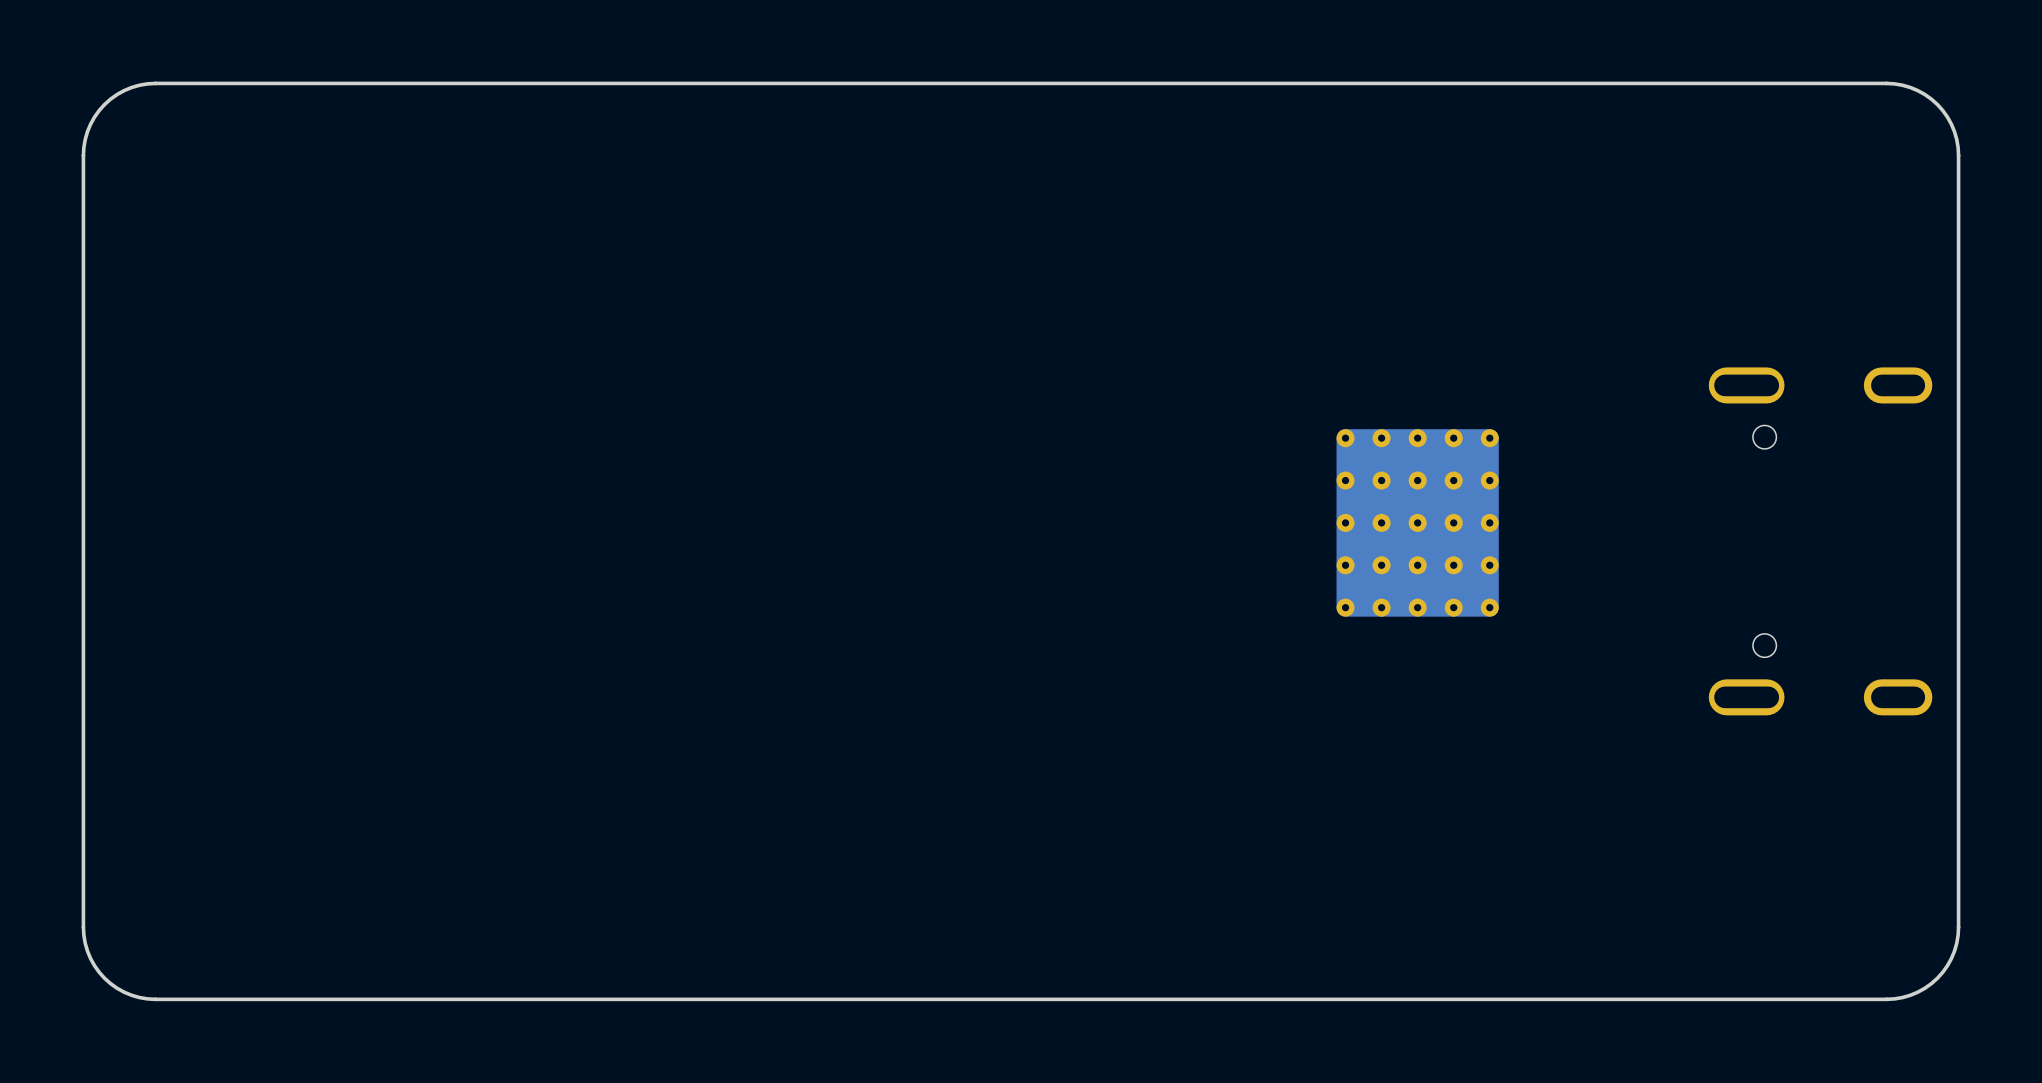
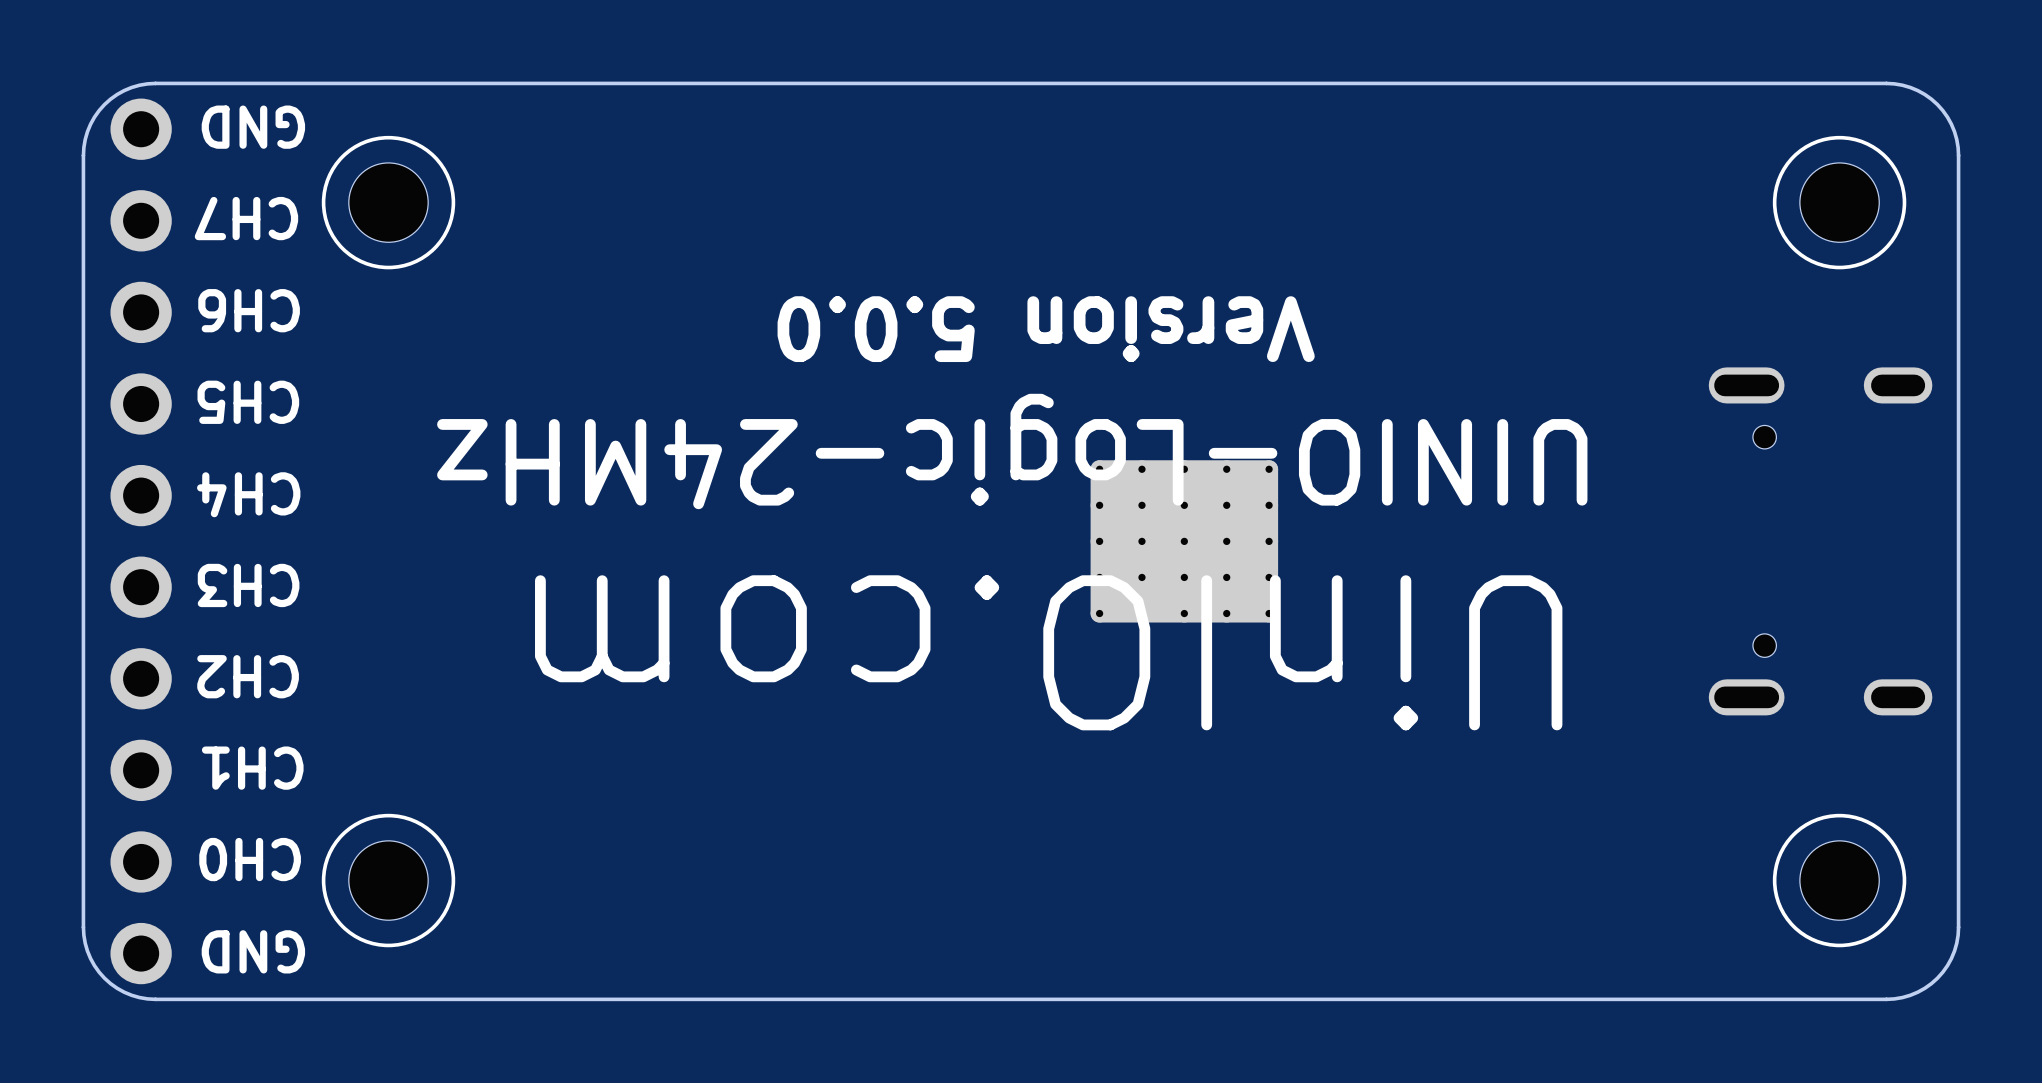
text: none -> GND (253, 127)
part: none -> (388, 202)
part: none -> (1839, 202)
text: none -> CH7 (246, 218)
text: none -> CH6 (249, 310)
text: none -> Version 5.0.0 (1046, 329)
text: none -> CH5 (248, 402)
text: none -> UINIO-Logic-24MHz (1012, 451)
text: none -> CH4 (248, 494)
part rotation: 0° (1417, 522) -> 90° clockwise (1184, 541)
part position: (1417, 522) -> (1184, 541)
part: none -> (141, 541)
text: none -> CH3 (248, 585)
text: none -> UinIO.com (1048, 652)
text: none -> CH2 (248, 676)
text: none -> CH1 (252, 768)
text: none -> CH0 (250, 859)
part: none -> (388, 880)
part: none -> (1839, 880)
text: none -> GND (253, 951)

